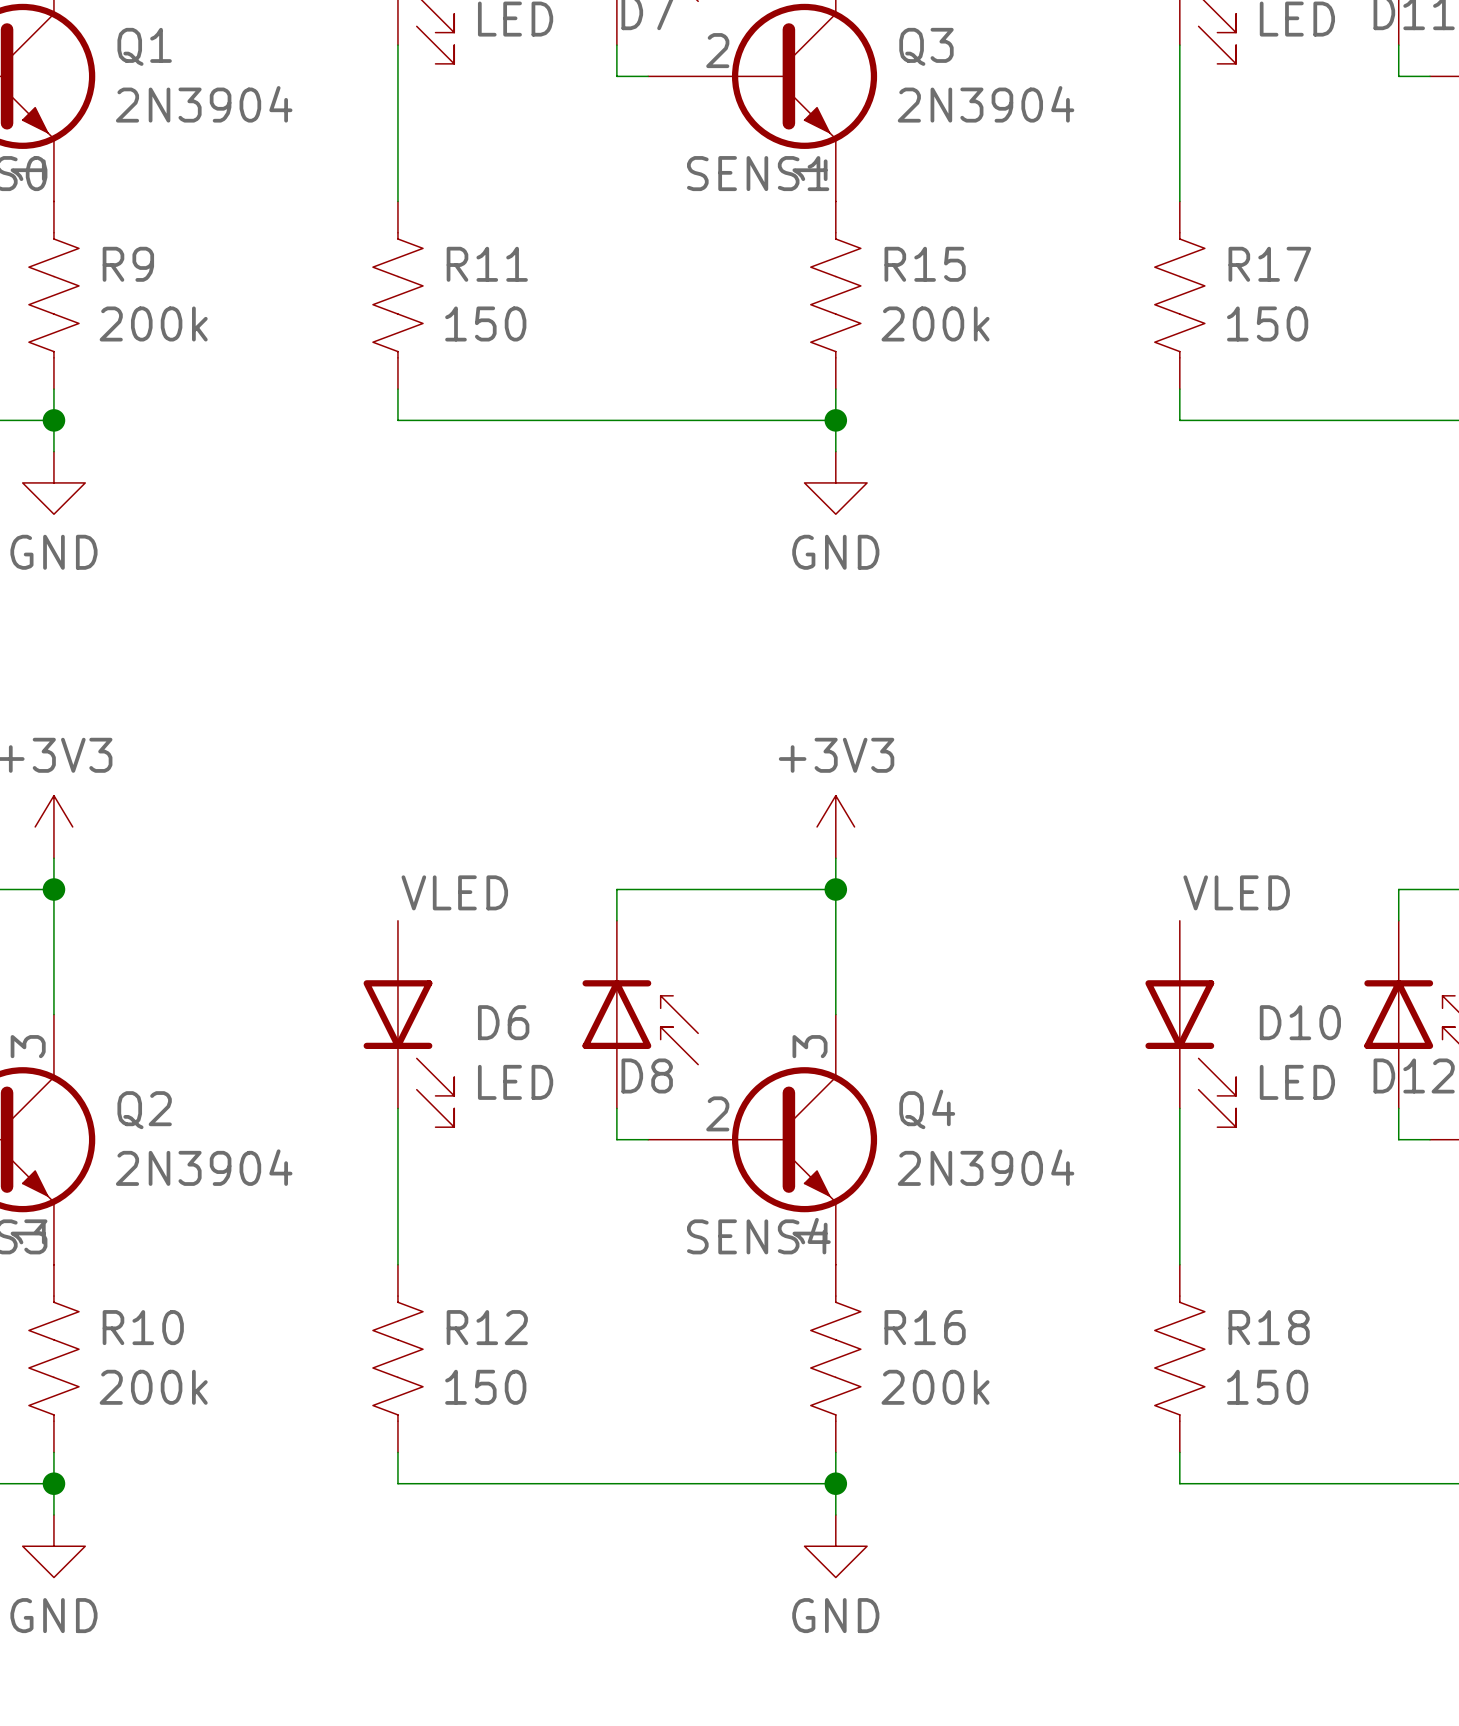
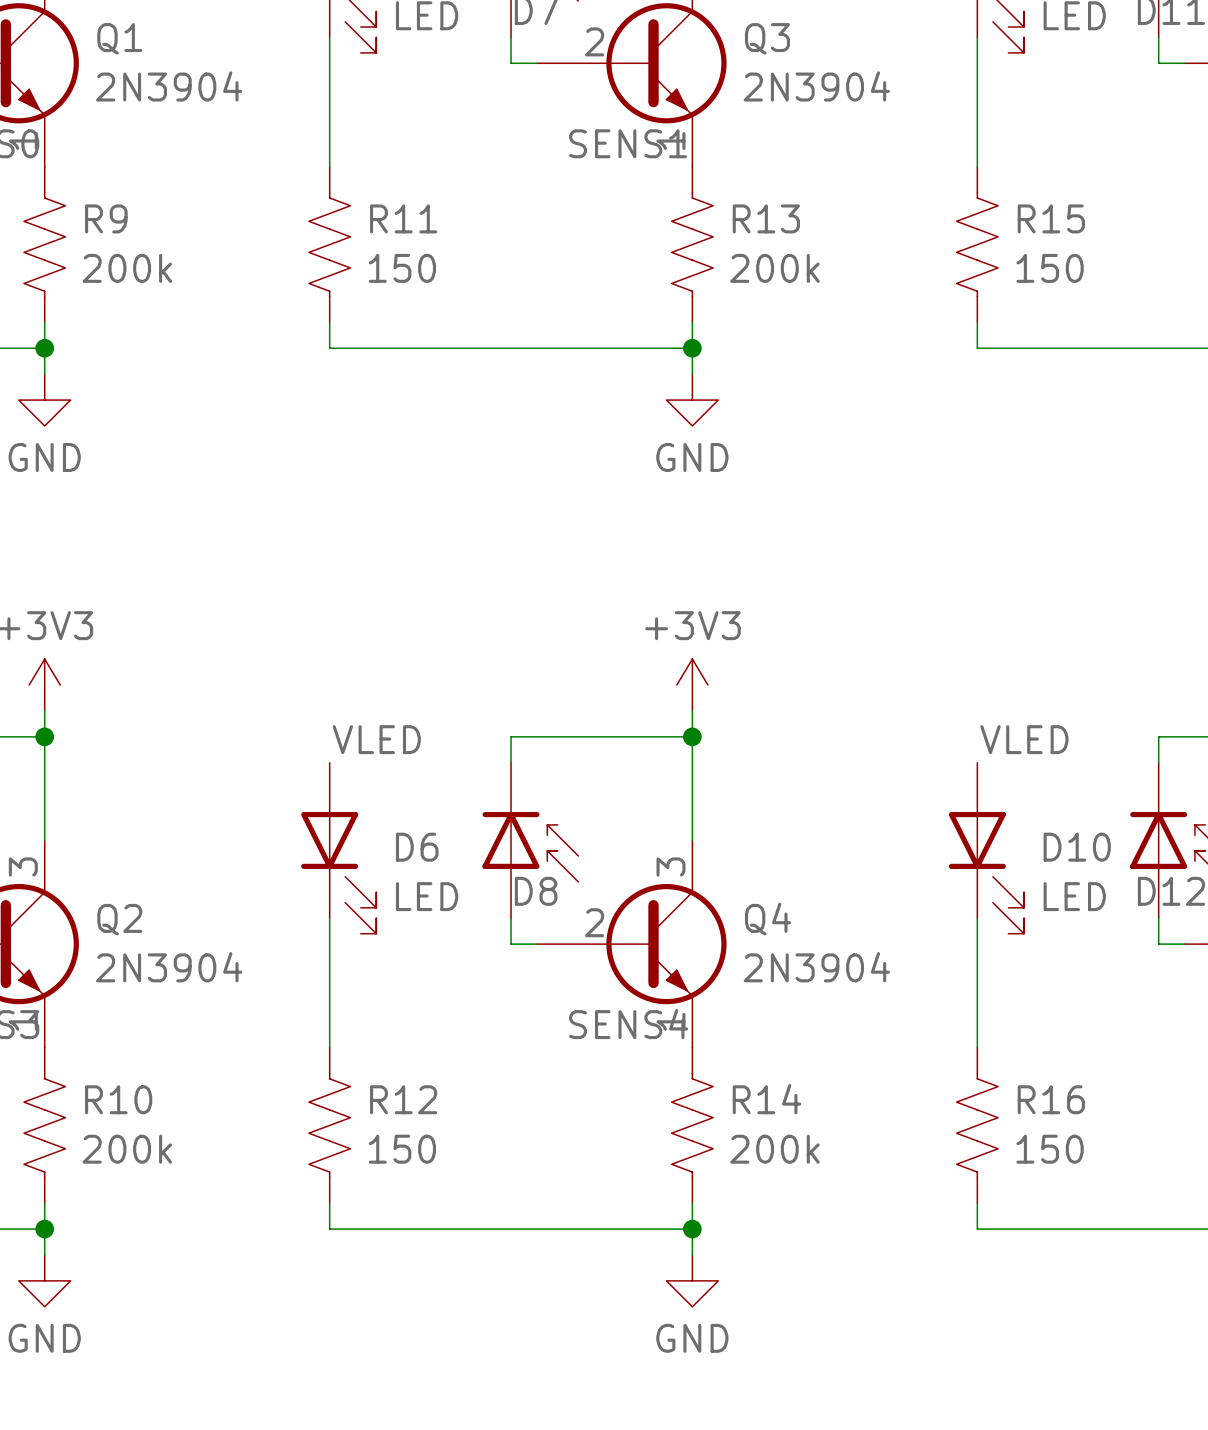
R15 name: R15 (925, 264) -> R13 (766, 218)
R17 name: R17 (1269, 264) -> R15 (1051, 218)
R16 name: R16 (925, 1327) -> R14 (766, 1099)
R18 name: R18 (1269, 1327) -> R16 (1051, 1099)

